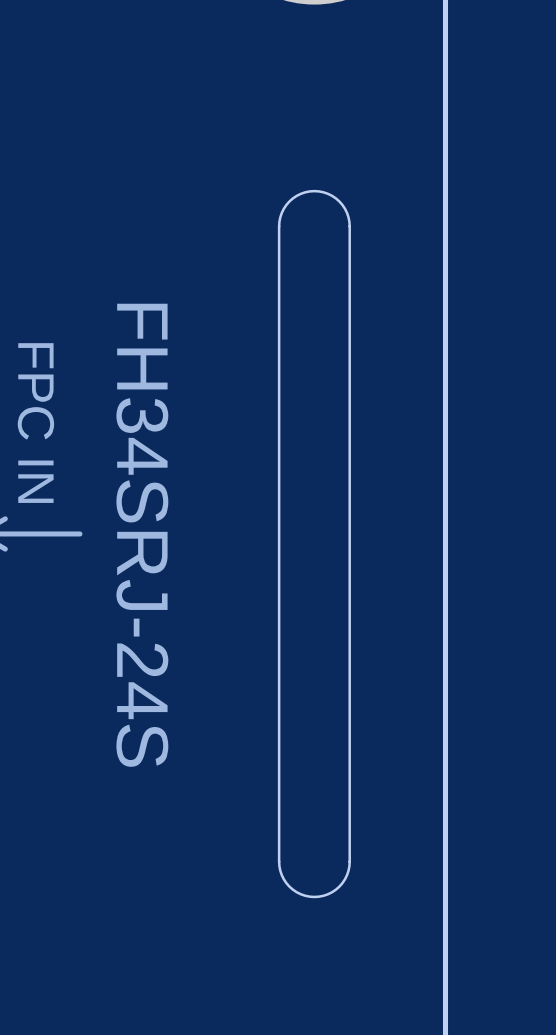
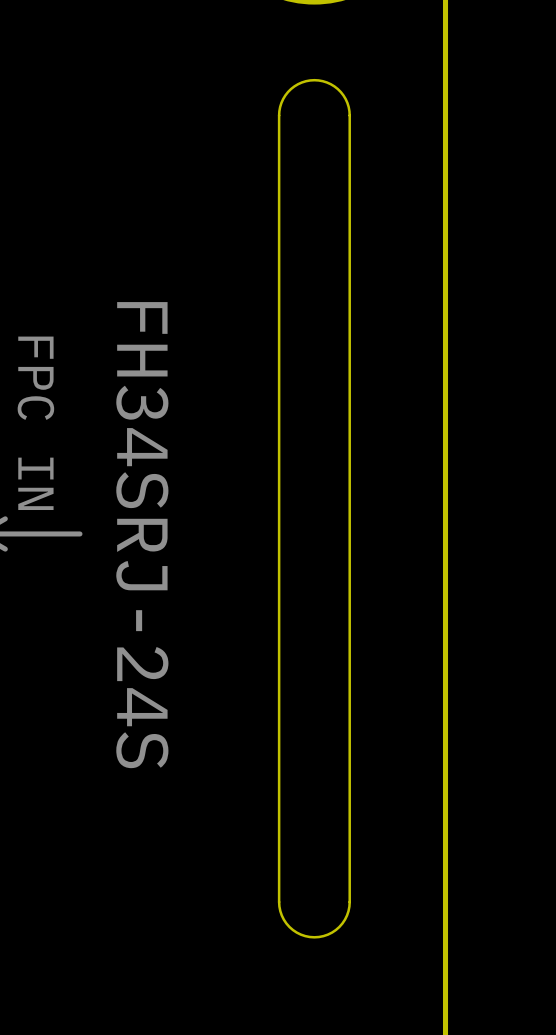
drawing shape: [277, 189, 351, 899] -> [277, 78, 351, 939]

